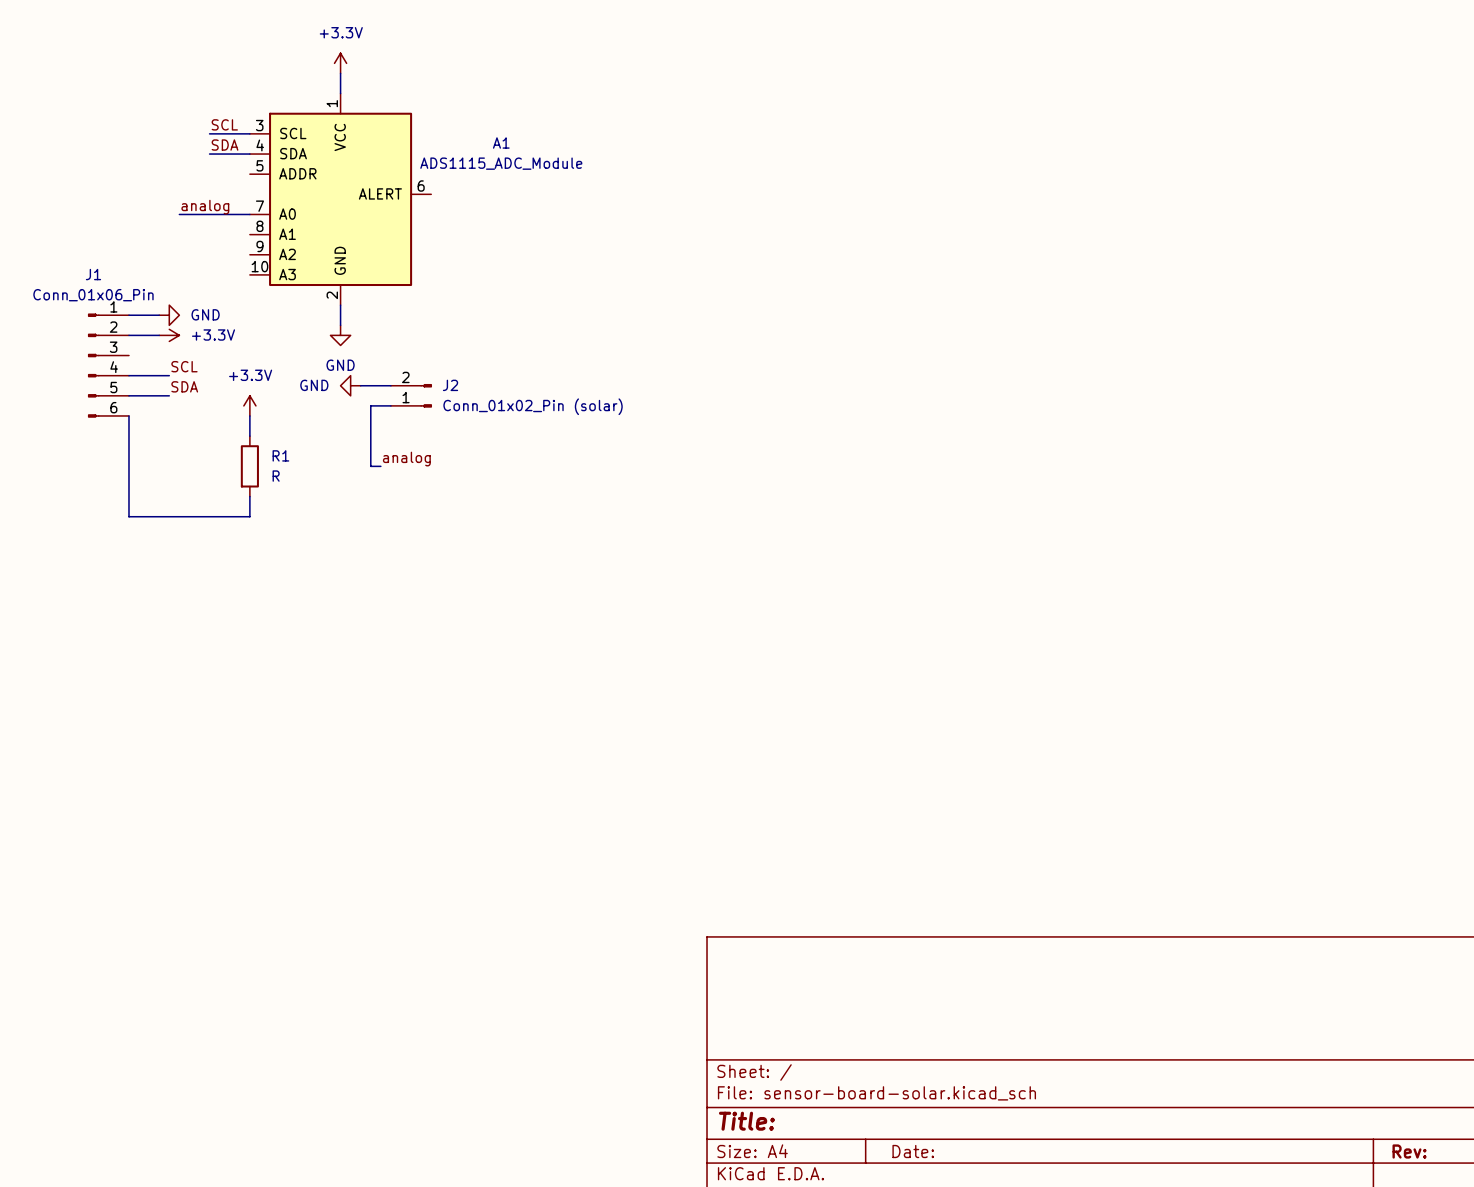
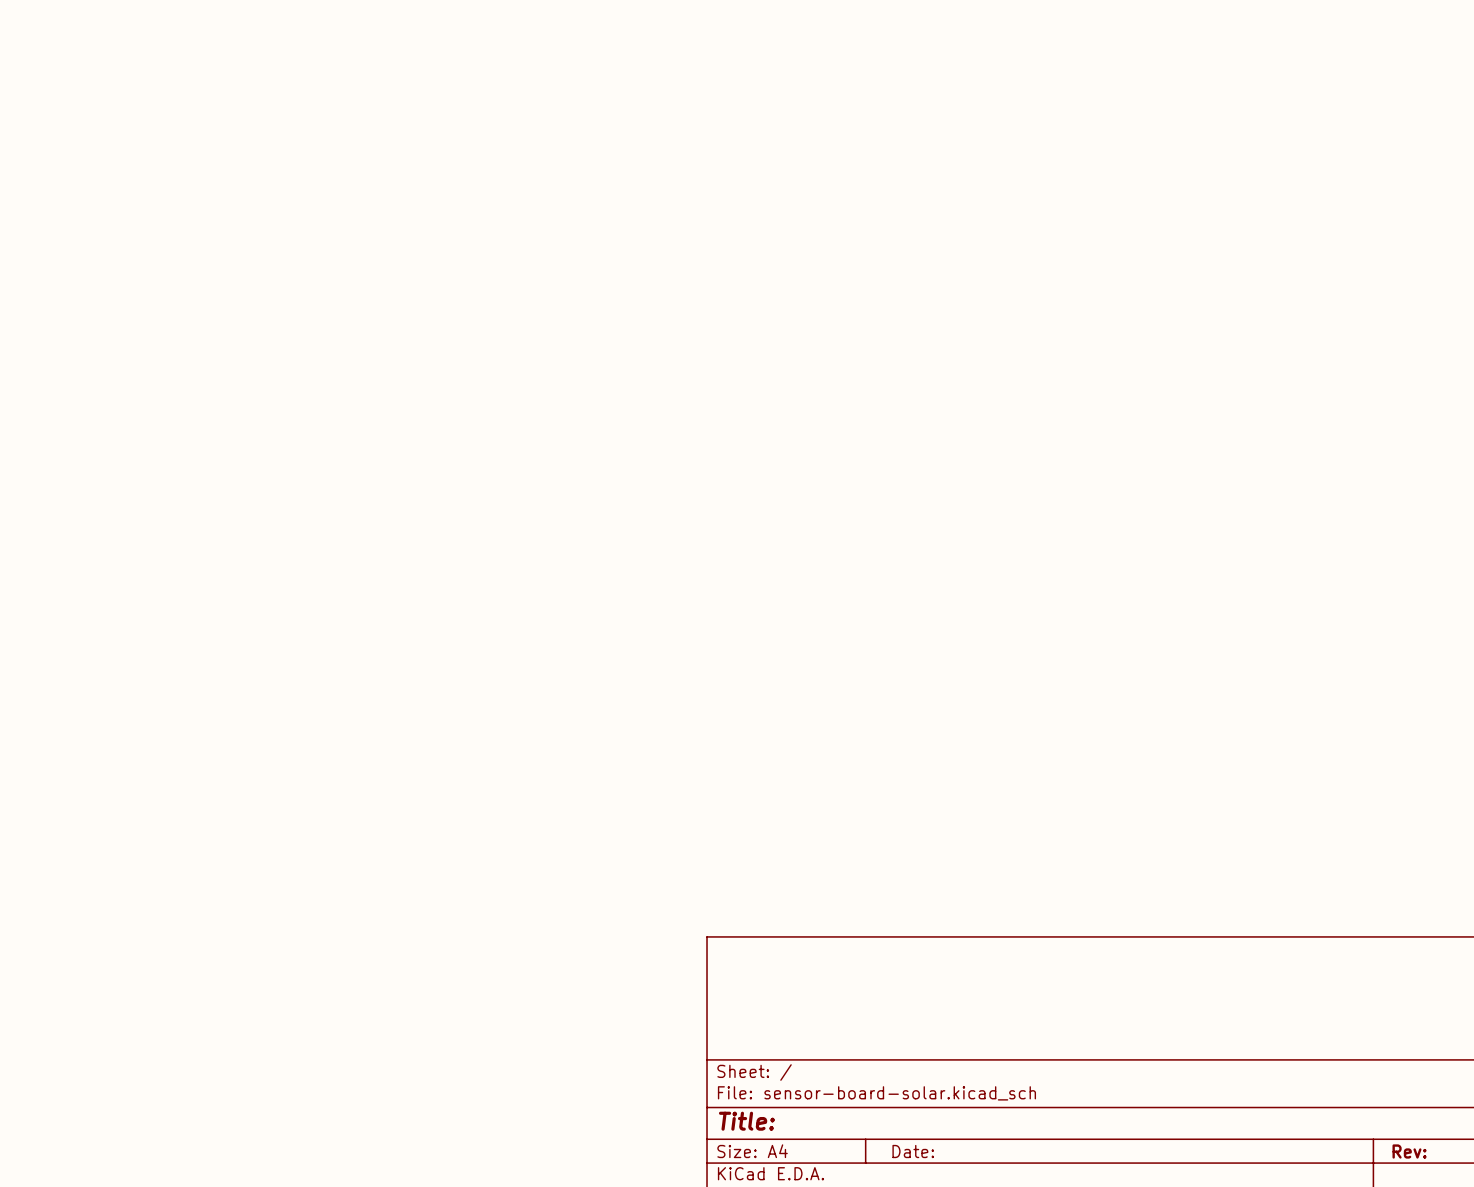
power symbol: +3.3V (340, 63) -> none
wire: (340, 73) (340, 93) -> none
label: SCL (224, 124) -> none
wire: (209, 133) (249, 133) -> none
label: SDA (225, 145) -> none
wire: (209, 154) (249, 154) -> none
A1: ADS1115_ADC_Module (340, 199) -> none
label: analog (205, 207) -> none
wire: (179, 214) (249, 214) -> none
wire: (340, 305) (340, 325) -> none
wire: (128, 315) (159, 315) -> none
power symbol: GND (169, 315) -> none
wire: (128, 335) (159, 335) -> none
power symbol: +3.3V (169, 335) -> none
power symbol: GND (340, 335) -> none
J1: Conn_01x06_Pin (108, 365) -> none
label: SCL (184, 366) -> none
wire: (128, 375) (169, 375) -> none
power symbol: GND (350, 385) -> none
wire: (360, 385) (390, 385) -> none
label: SDA (184, 386) -> none
wire: (128, 395) (169, 395) -> none
J2: Conn_01x02_Pin (solar) (411, 395) -> none
power symbol: +3.3V (249, 405) -> none
wire: (390, 405) (370, 405) (370, 466) (380, 466) -> none
wire: (128, 415) (128, 516) (249, 516) (249, 496) -> none
wire: (249, 415) (249, 436) -> none
label: analog (406, 459) -> none
R1: R (249, 466) -> none

